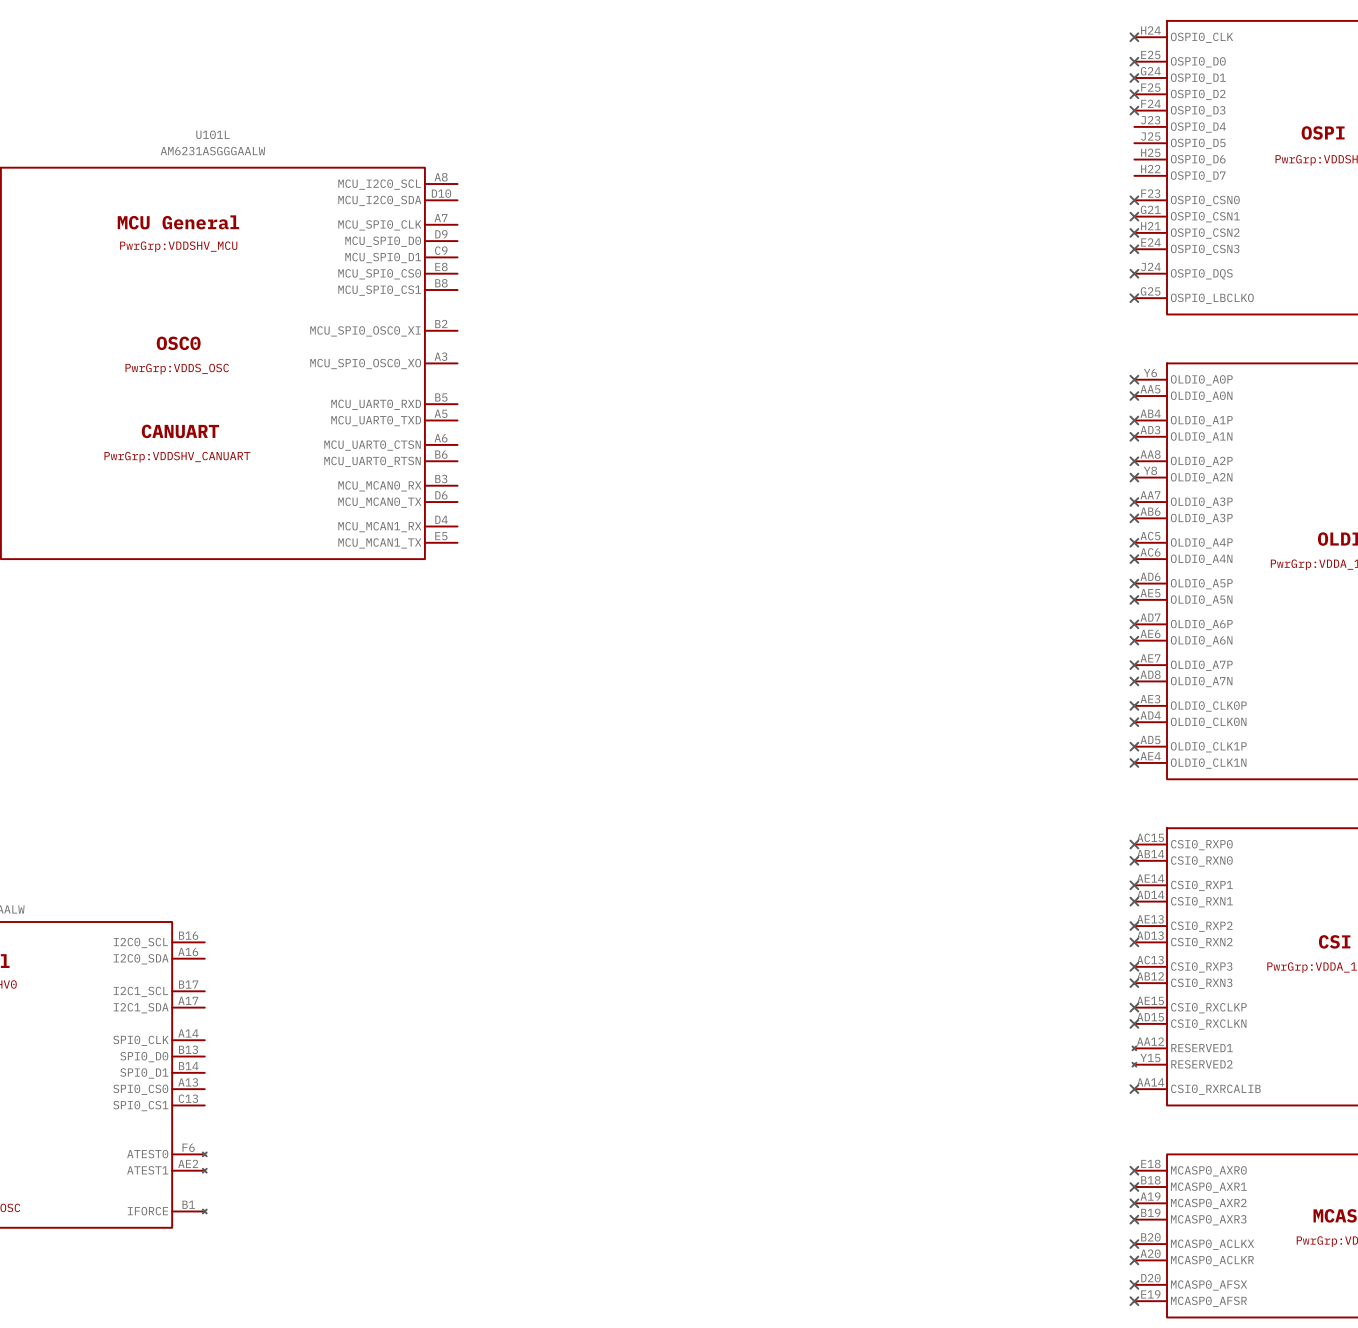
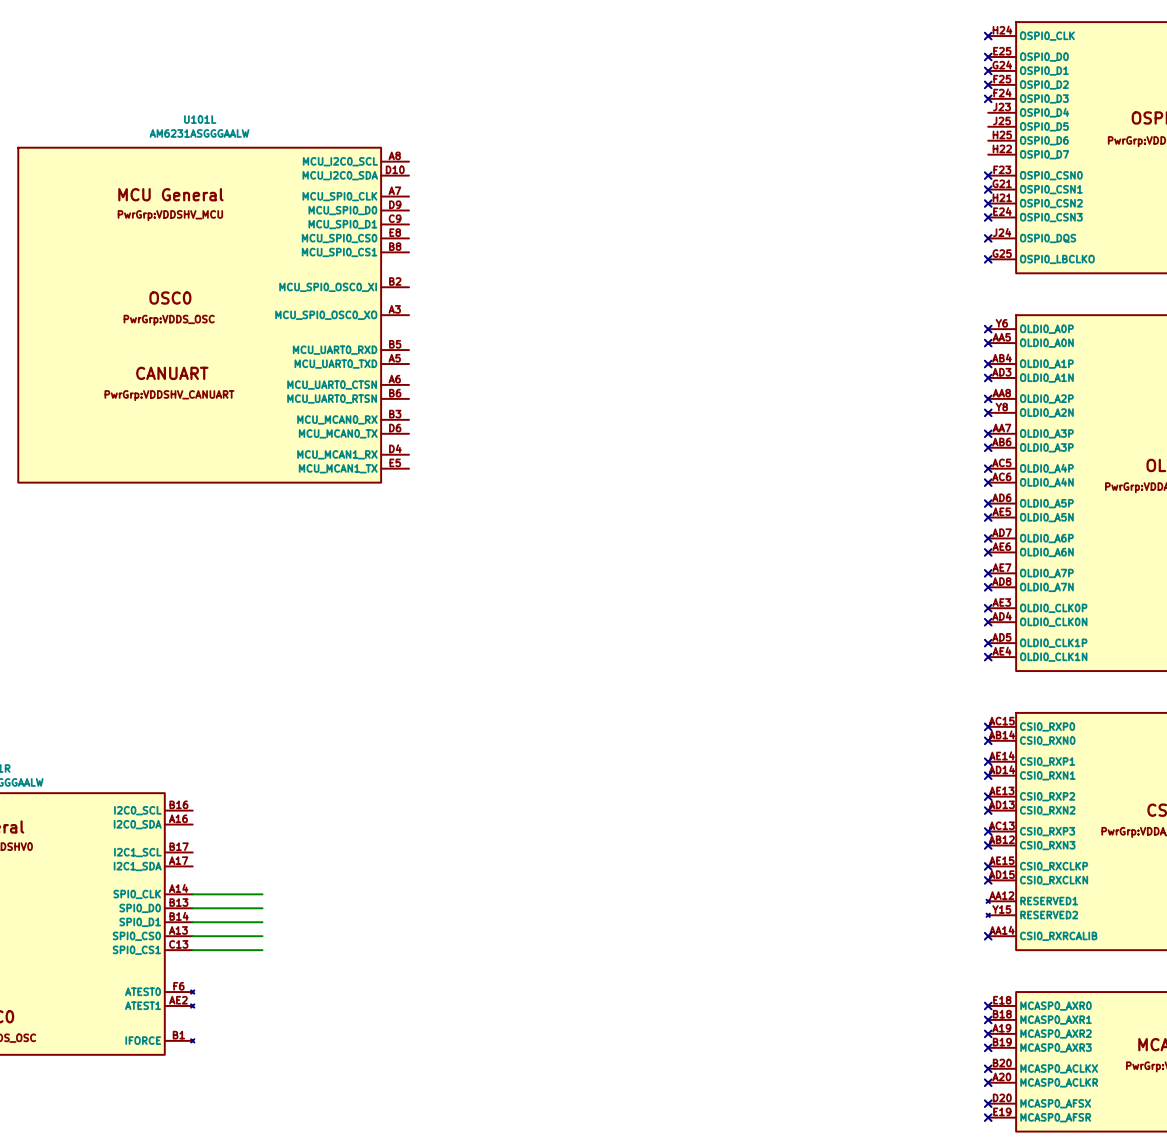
wire: none -> (192, 894) (262, 894)
wire: none -> (192, 908) (262, 908)
wire: none -> (192, 922) (262, 922)
wire: none -> (192, 936) (262, 936)
wire: none -> (192, 950) (262, 950)

